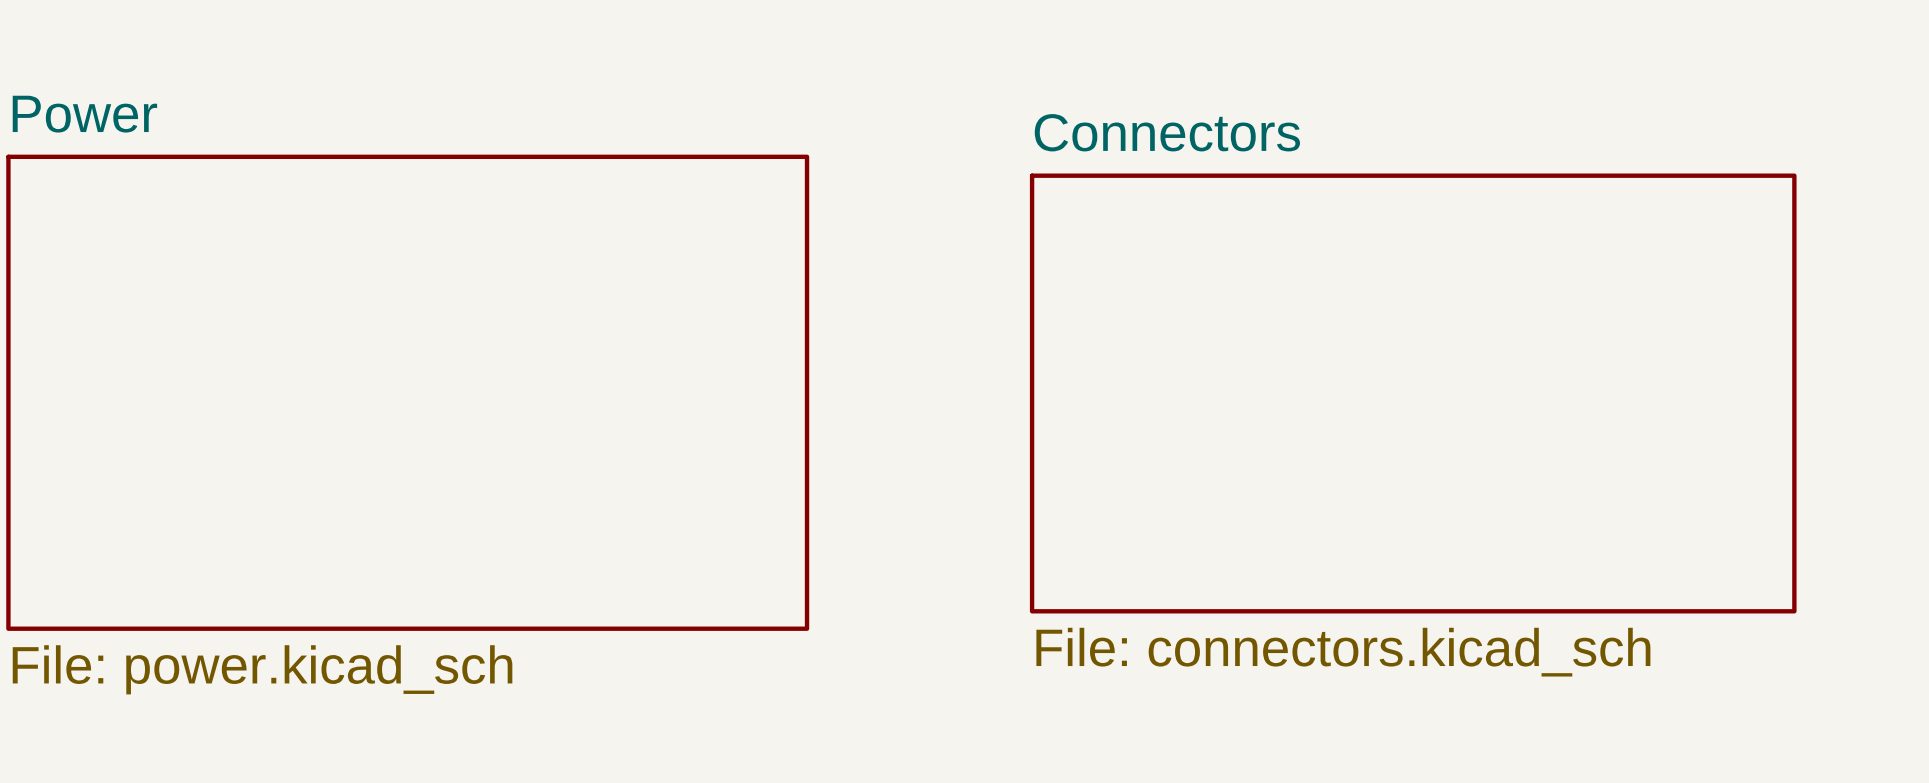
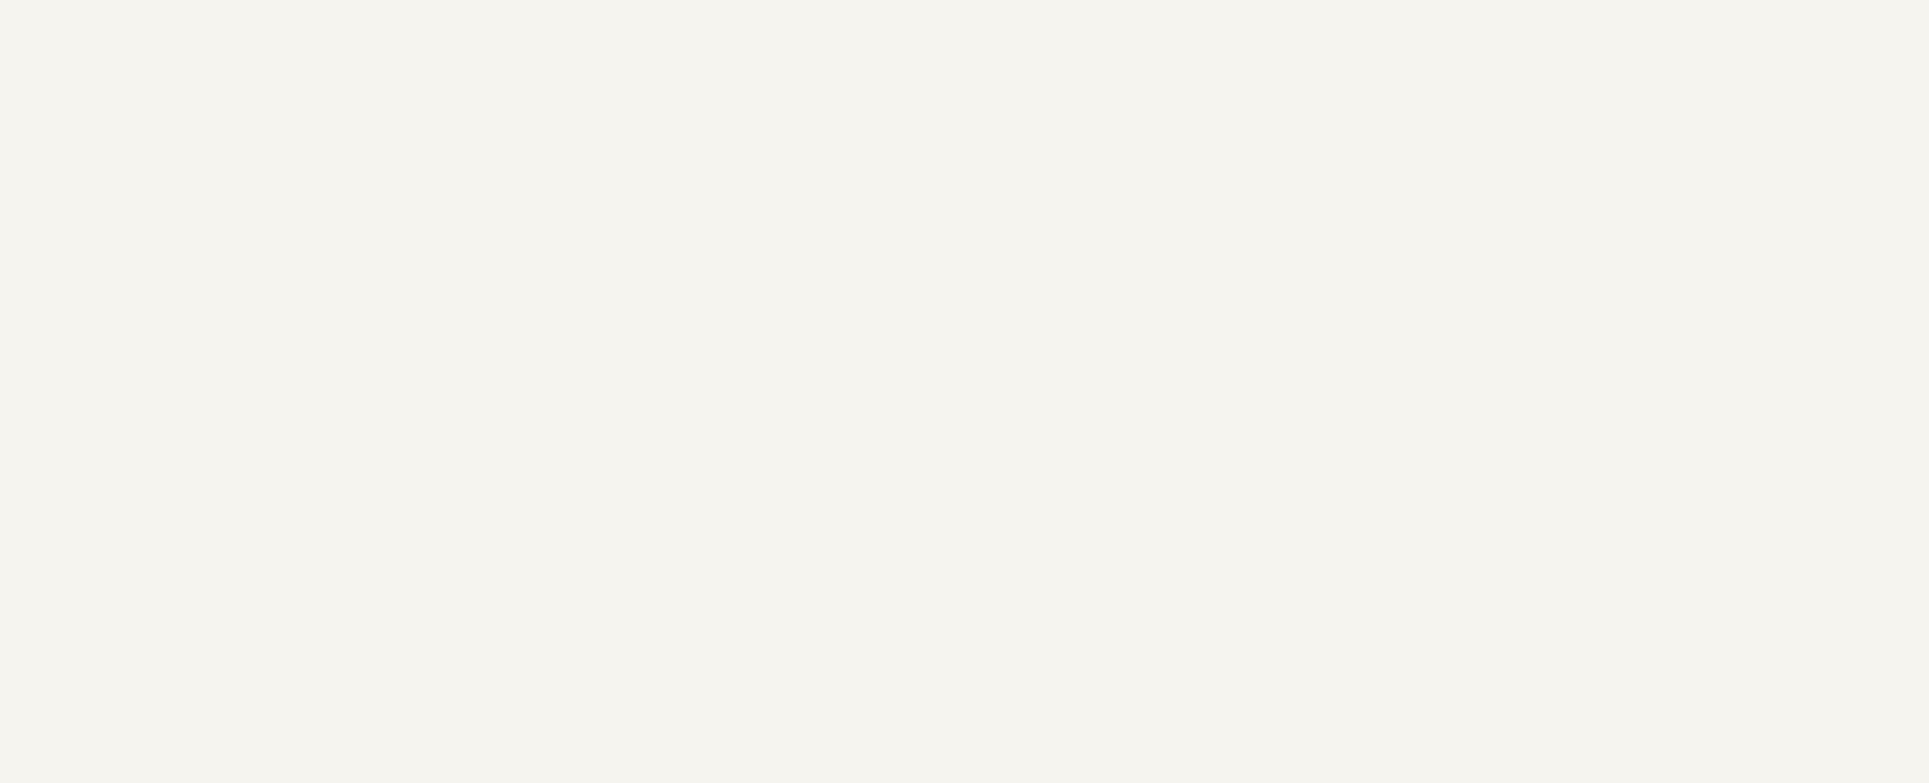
sheet Power: File: power.kicad_sch (407, 392) -> none
sheet Connectors: File: connectors.kicad_sch (1413, 393) -> none

